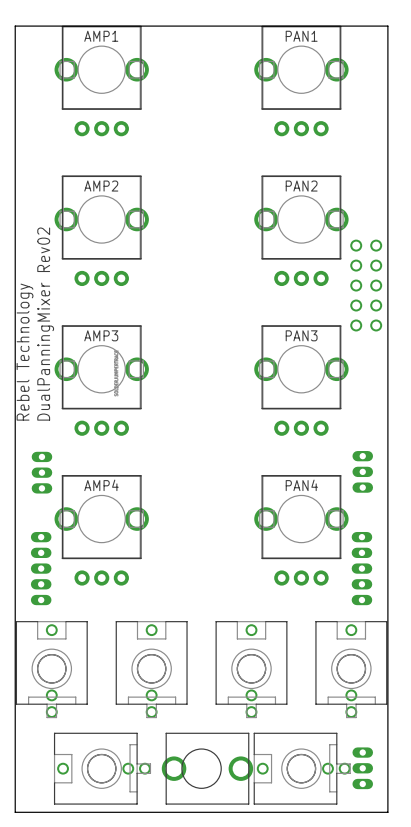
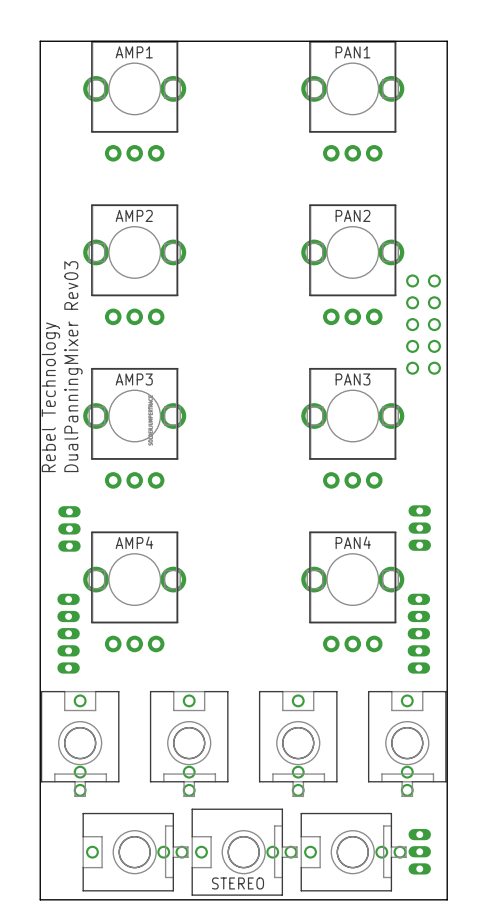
text: DualPanningMixer Rev02 (45, 324) -> DualPanningMixer Rev03 (73, 366)
part footprint: [161, 732, 254, 805] -> [191, 808, 298, 896]
text: none -> STEREO (238, 883)

